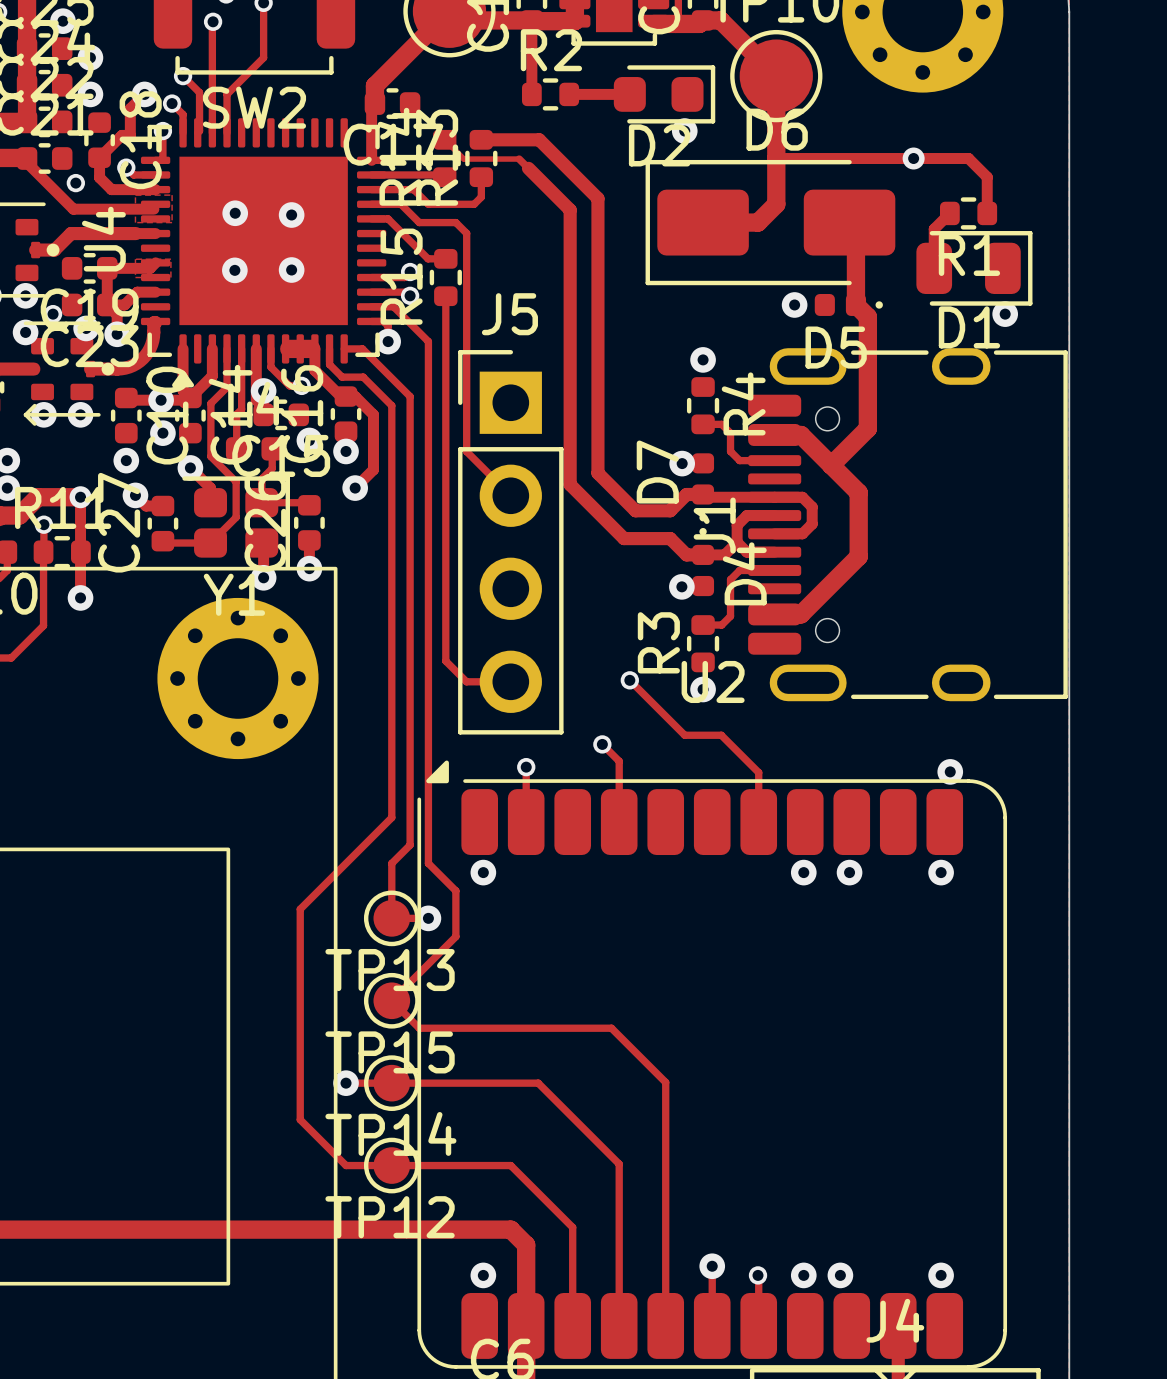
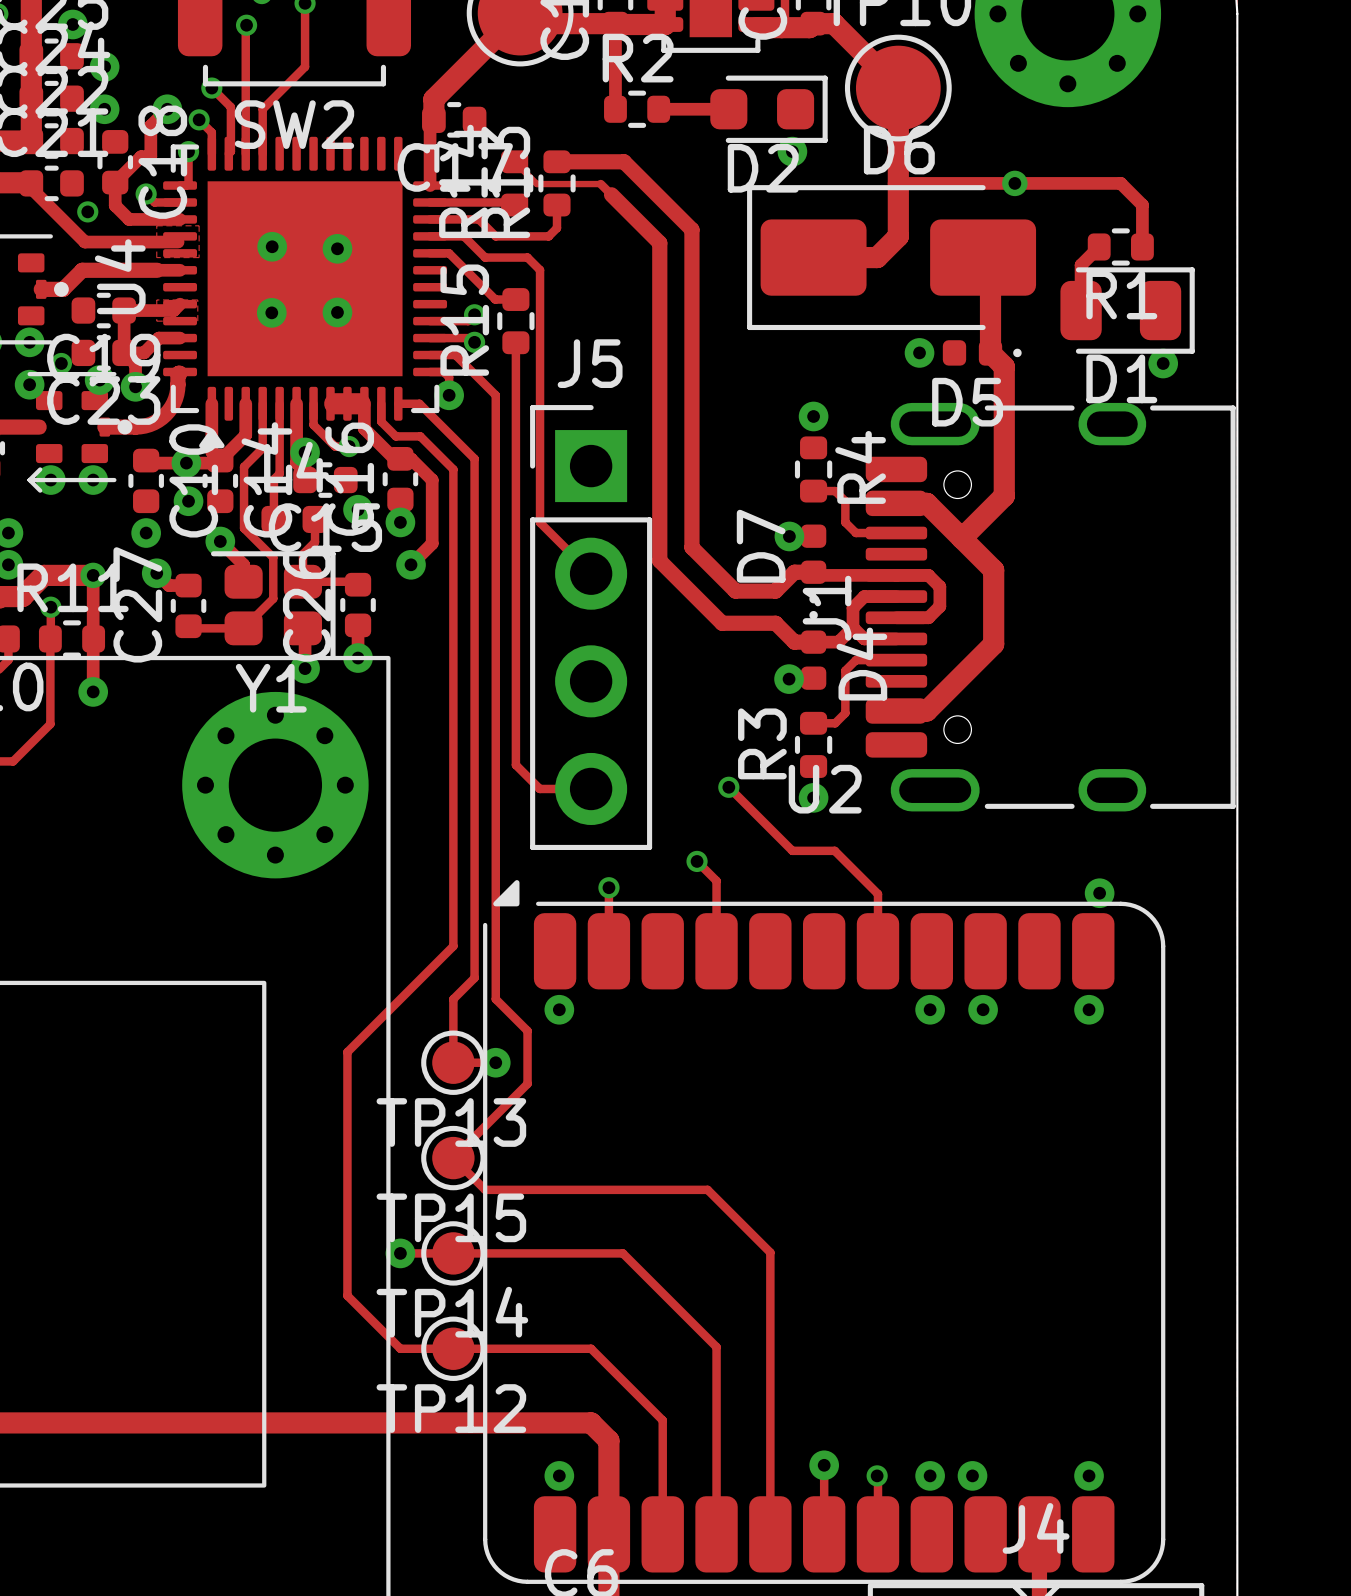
via position: (913, 158) -> (1014, 183)

